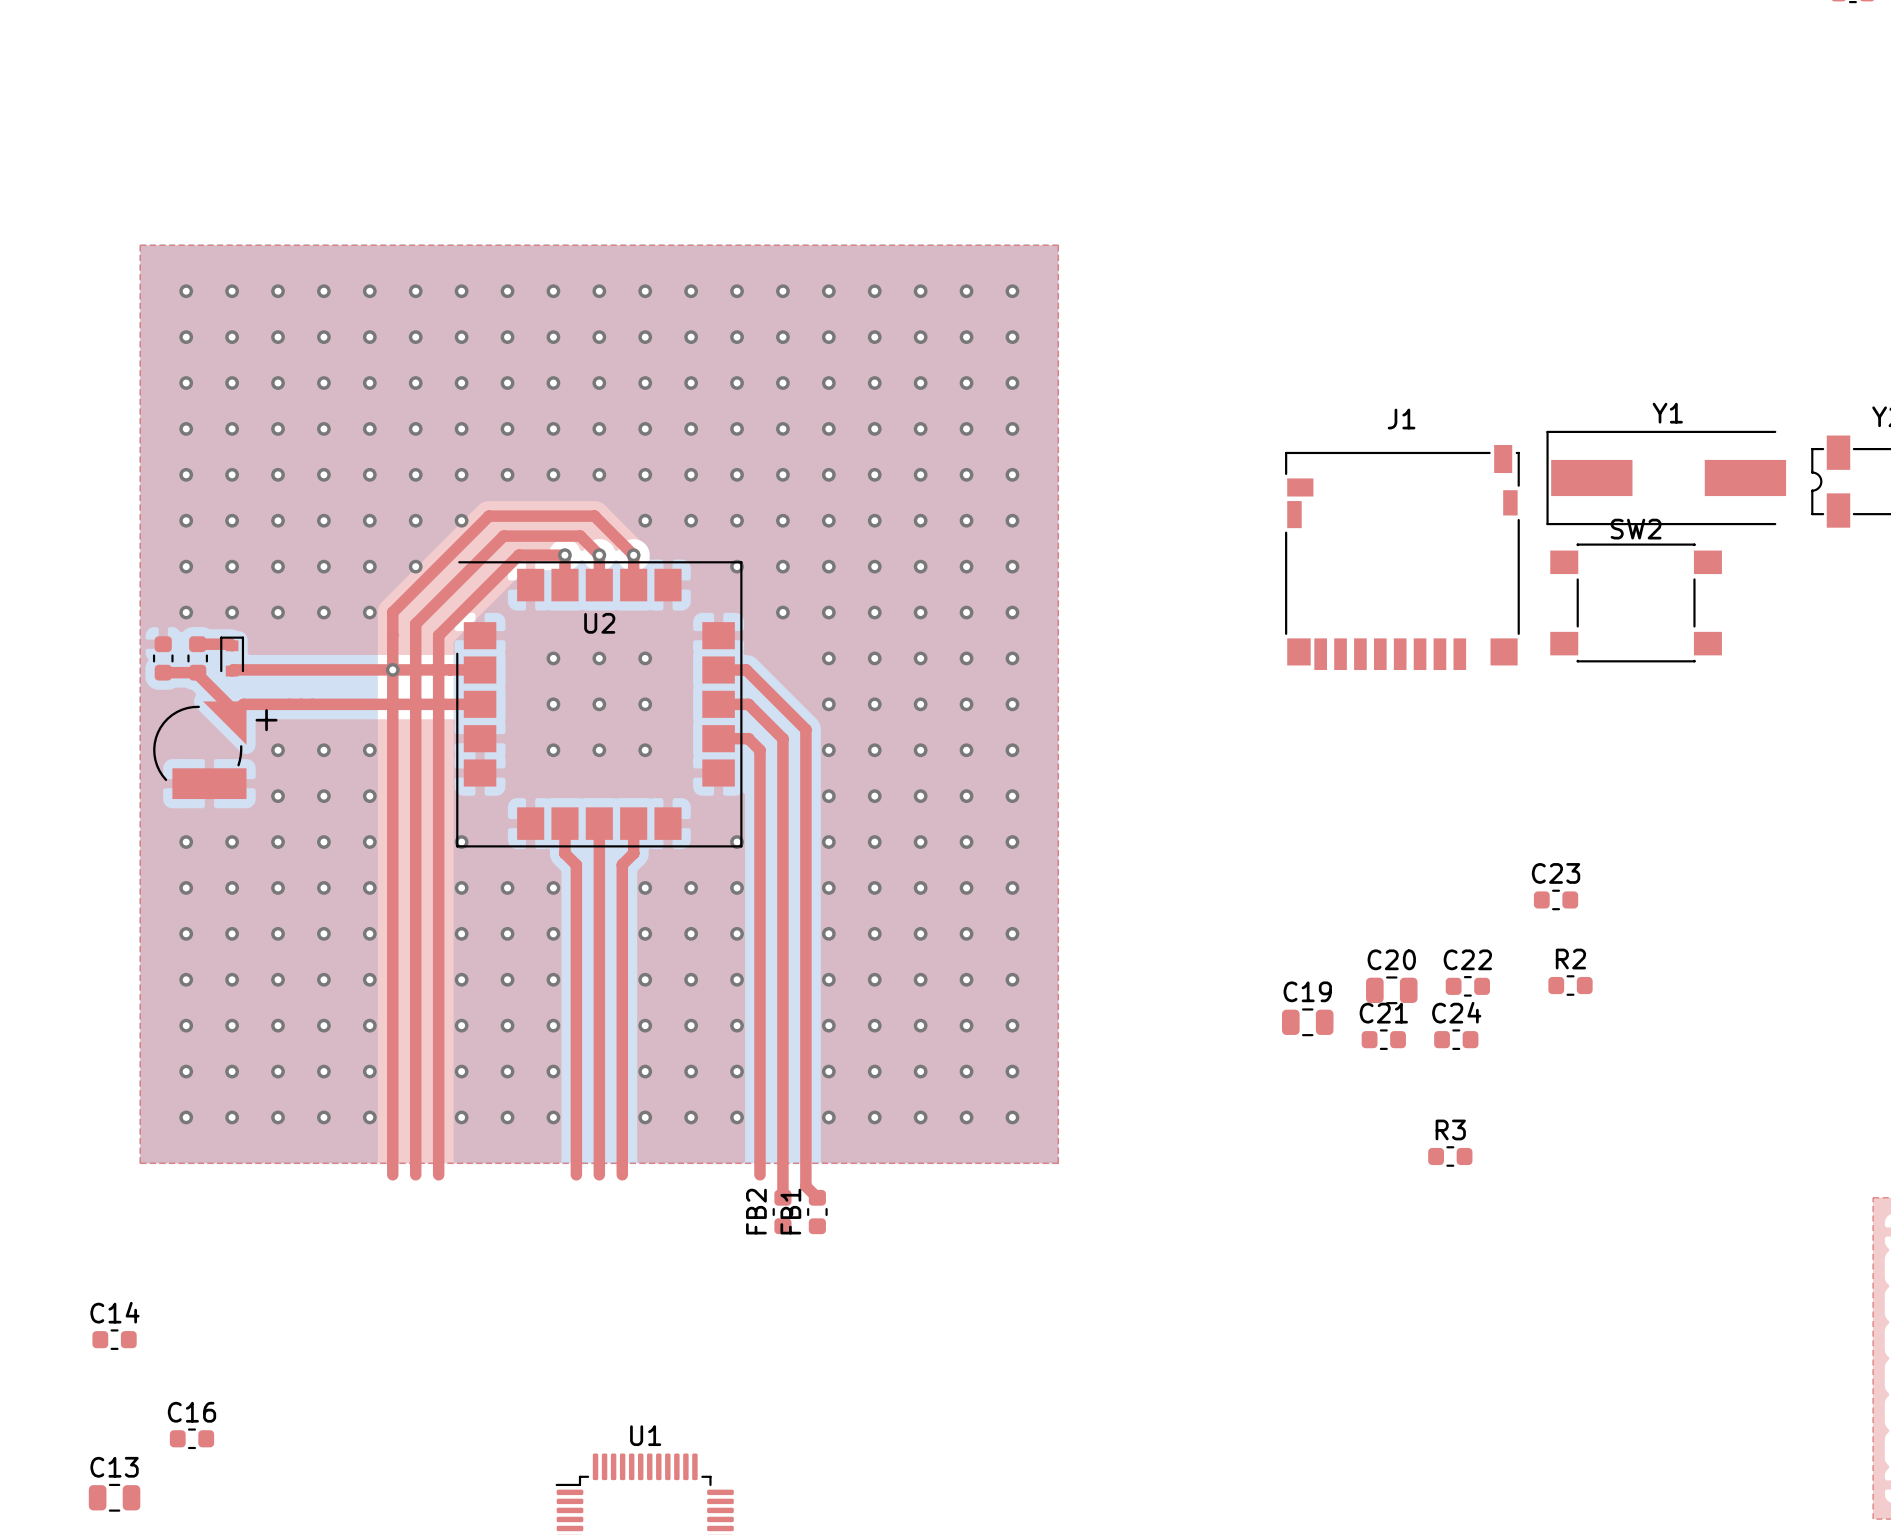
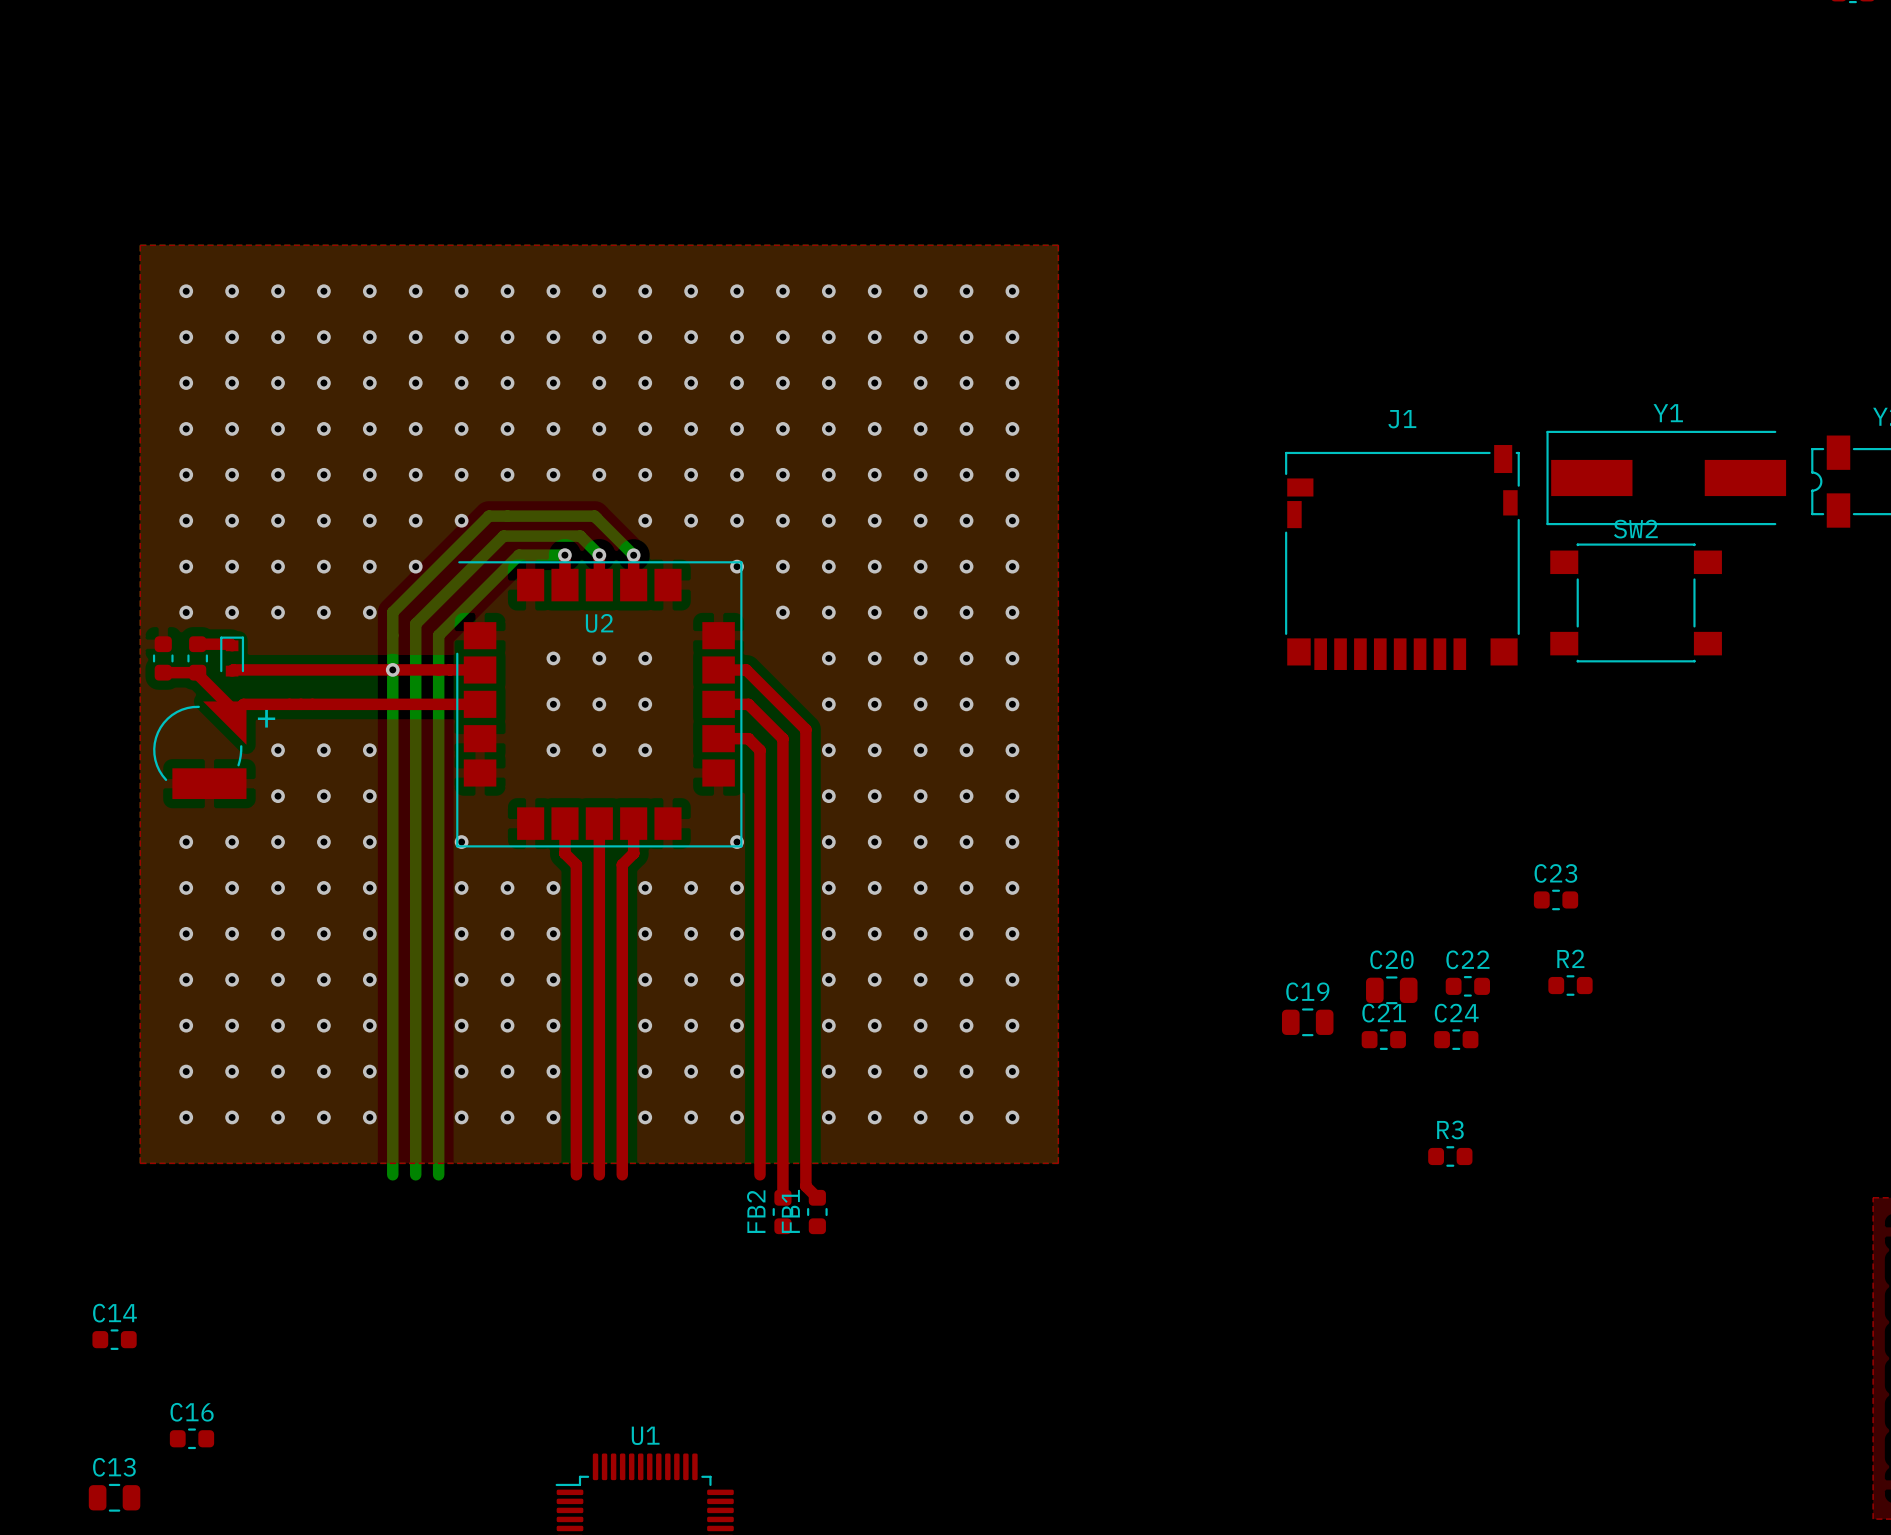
top track: (594, 516) (488, 516) (392, 612) (392, 1174) -> none
top track: (594, 516) (633, 555) -> none
bottom track: none -> (596, 518) (594, 516) (488, 516) (392, 612) (392, 1174)
bottom track: none -> (596, 518) (633, 555)
top track: (564, 555) (519, 555) (438, 635) (438, 1174) -> none
bottom track: none -> (564, 555) (519, 555) (438, 635) (438, 1174)
top track: (599, 555) (580, 536) (503, 536) (415, 624) (415, 1174) -> none
bottom track: none -> (599, 555) (580, 536) (503, 536) (415, 624) (415, 1174)

